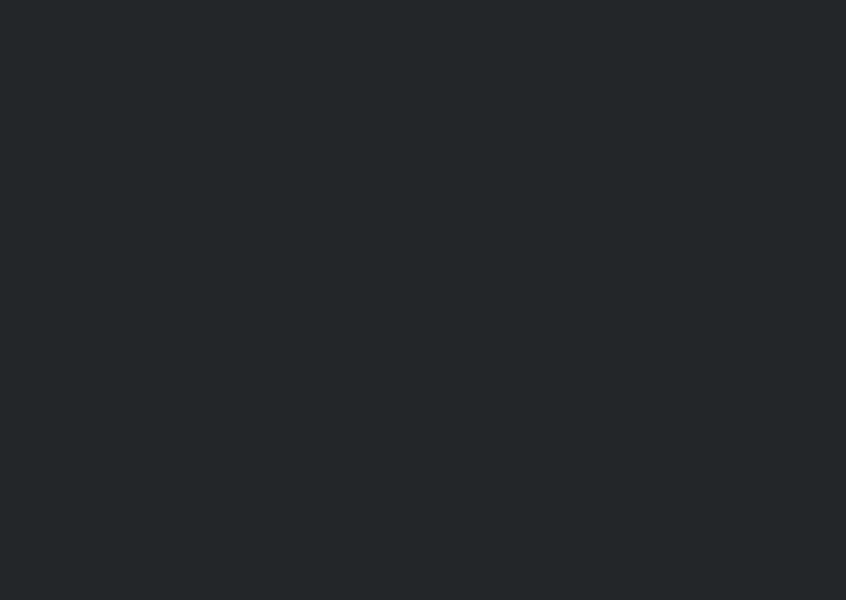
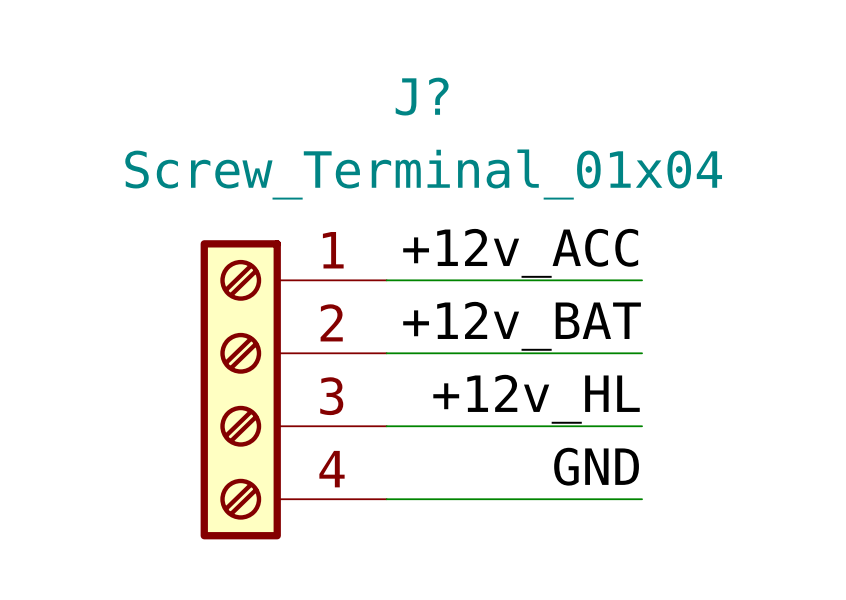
label: none -> +12v_ACC (520, 253)
wire: none -> (386, 280) (642, 280)
label: none -> +12v_BAT (522, 326)
wire: none -> (386, 353) (642, 353)
J?: none -> Screw_Terminal_01x04 (293, 389)
label: none -> +12v_HL (536, 399)
wire: none -> (386, 426) (642, 426)
label: none -> GND (596, 466)
wire: none -> (386, 499) (642, 499)

